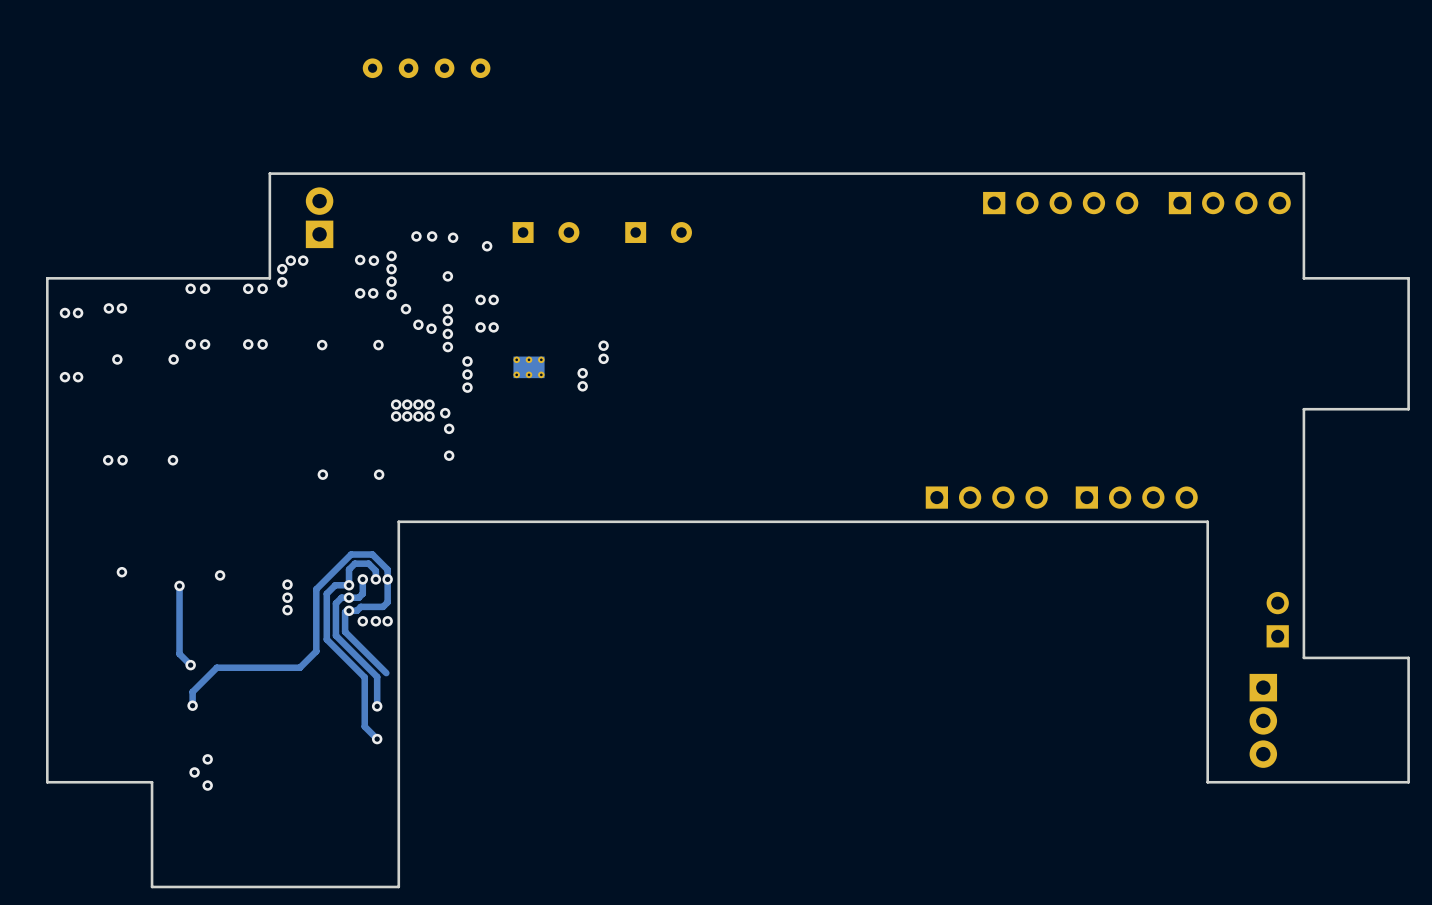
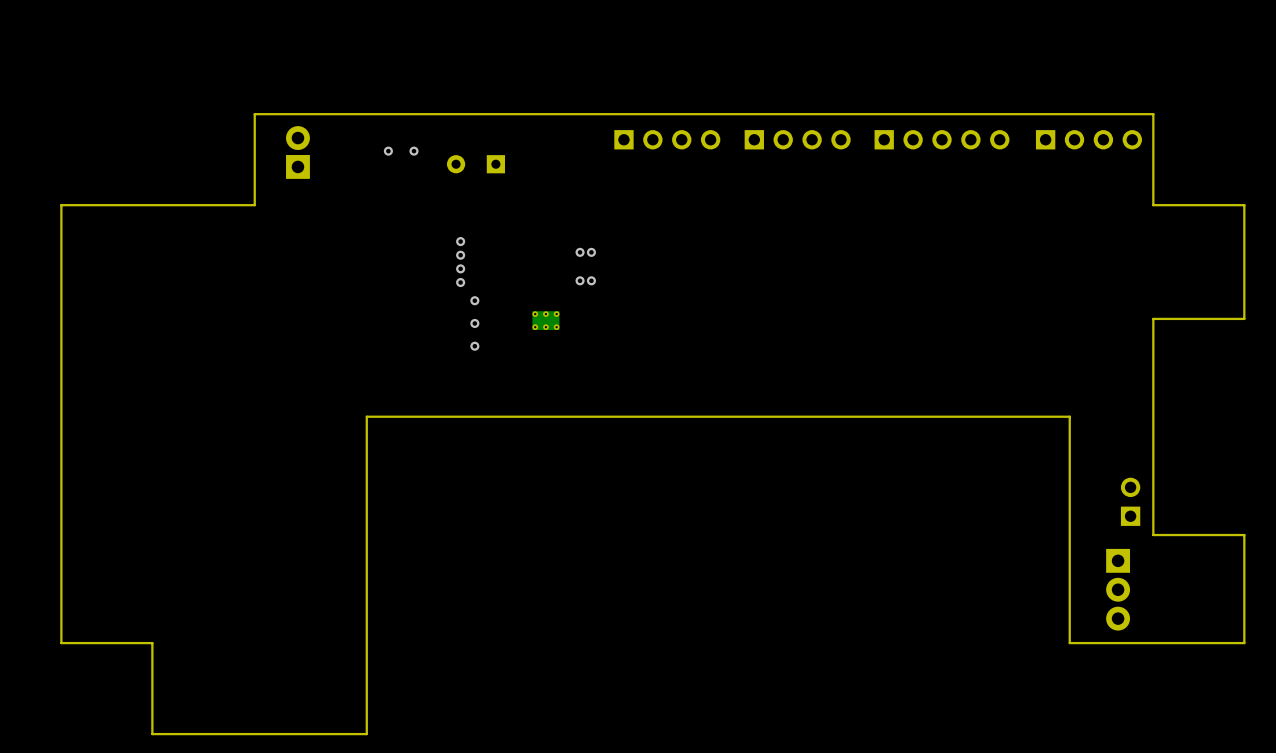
part: (372, 68) -> none
part: (408, 68) -> none
part: (444, 68) -> none
part: (480, 68) -> none
part: none -> (667, 139)
part: none -> (797, 139)
via: none -> (388, 151)
via: none -> (413, 151)
part rotation: 0° (546, 232) -> 180° (475, 164)
part: (658, 232) -> none
via: (416, 236) -> none
via: (432, 236) -> none
via: (453, 237) -> none
via: (487, 246) -> none
via: (391, 256) -> none
via: (290, 260) -> none
via: (303, 260) -> none
via: (360, 260) -> none
via: (373, 260) -> none
via: (282, 269) -> none
via: (391, 269) -> none
via: (447, 276) -> none
via: (391, 281) -> none
via: (282, 282) -> none
via: (190, 288) -> none
via: (205, 288) -> none
via: (248, 288) -> none
via: (262, 288) -> none
via: (360, 293) -> none
via: (373, 293) -> none
via: (391, 294) -> none
via: (480, 299) -> none
via: (493, 299) -> none
via: (108, 308) -> none
via: (121, 308) -> none
via: (405, 309) -> none
via: (447, 309) -> none
via: (64, 313) -> none
via: (78, 313) -> none
via: (447, 320) -> none
via: none -> (460, 241)
via: (418, 324) -> none
via: (480, 327) -> none
via: (493, 327) -> none
via: (431, 328) -> none
via: none -> (580, 252)
via: none -> (591, 252)
via: (447, 333) -> none
via: none -> (460, 255)
via: (190, 344) -> none
via: (205, 344) -> none
via: (248, 344) -> none
via: (262, 344) -> none
via: (322, 345) -> none
via: (378, 345) -> none
via: (603, 345) -> none
via: (447, 347) -> none
via: none -> (460, 268)
via: (603, 358) -> none
via: (117, 359) -> none
via: (173, 359) -> none
via: (467, 361) -> none
via: none -> (580, 280)
via: none -> (591, 280)
via: none -> (460, 282)
part position: (529, 367) -> (545, 320)
via: (582, 373) -> none
via: (467, 374) -> none
via: (64, 377) -> none
via: (78, 377) -> none
via: (582, 386) -> none
via: (467, 387) -> none
via: none -> (474, 300)
via: (396, 404) -> none
via: (407, 404) -> none
via: (418, 404) -> none
via: (429, 404) -> none
via: (445, 413) -> none
via: none -> (474, 323)
via: (396, 416) -> none
via: (407, 416) -> none
via: (418, 416) -> none
via: (429, 416) -> none
via: (449, 428) -> none
via: none -> (474, 346)
via: (449, 455) -> none
via: (108, 460) -> none
via: (122, 460) -> none
via: (172, 460) -> none
via: (322, 474) -> none
via: (379, 474) -> none
part: (986, 497) -> none
part: (1136, 497) -> none
via: (121, 572) -> none
via: (220, 575) -> none
track: (362, 579) (362, 593) (358, 597) (341, 597) (335, 603) (335, 635) (377, 676) (377, 706) -> none
via: (362, 579) -> none
track: (375, 579) (375, 570) (368, 563) (354, 563) (349, 569) (349, 585) (335, 585) (326, 593) (326, 639) (364, 677) (364, 726) (377, 739) -> none
via: (375, 579) -> none
via: (387, 579) -> none
via: (287, 584) -> none
track: (179, 585) (179, 653) (190, 665) -> none
via: (179, 585) -> none
via: (349, 585) -> none
via: (287, 597) -> none
via: (349, 597) -> none
via: (287, 610) -> none
via: (349, 610) -> none
via: (362, 621) -> none
via: (375, 621) -> none
via: (387, 621) -> none
via: (190, 665) -> none
track: (386, 673) (345, 631) (345, 612) (356, 610) (360, 606) (383, 606) (387, 602) (387, 569) (372, 554) (351, 554) (316, 589) (316, 651) (299, 667) (216, 667) (192, 691) (192, 705) -> none
via: (192, 705) -> none
via: (377, 706) -> none
via: (377, 739) -> none
via: (207, 759) -> none
via: (194, 772) -> none
via: (207, 785) -> none

